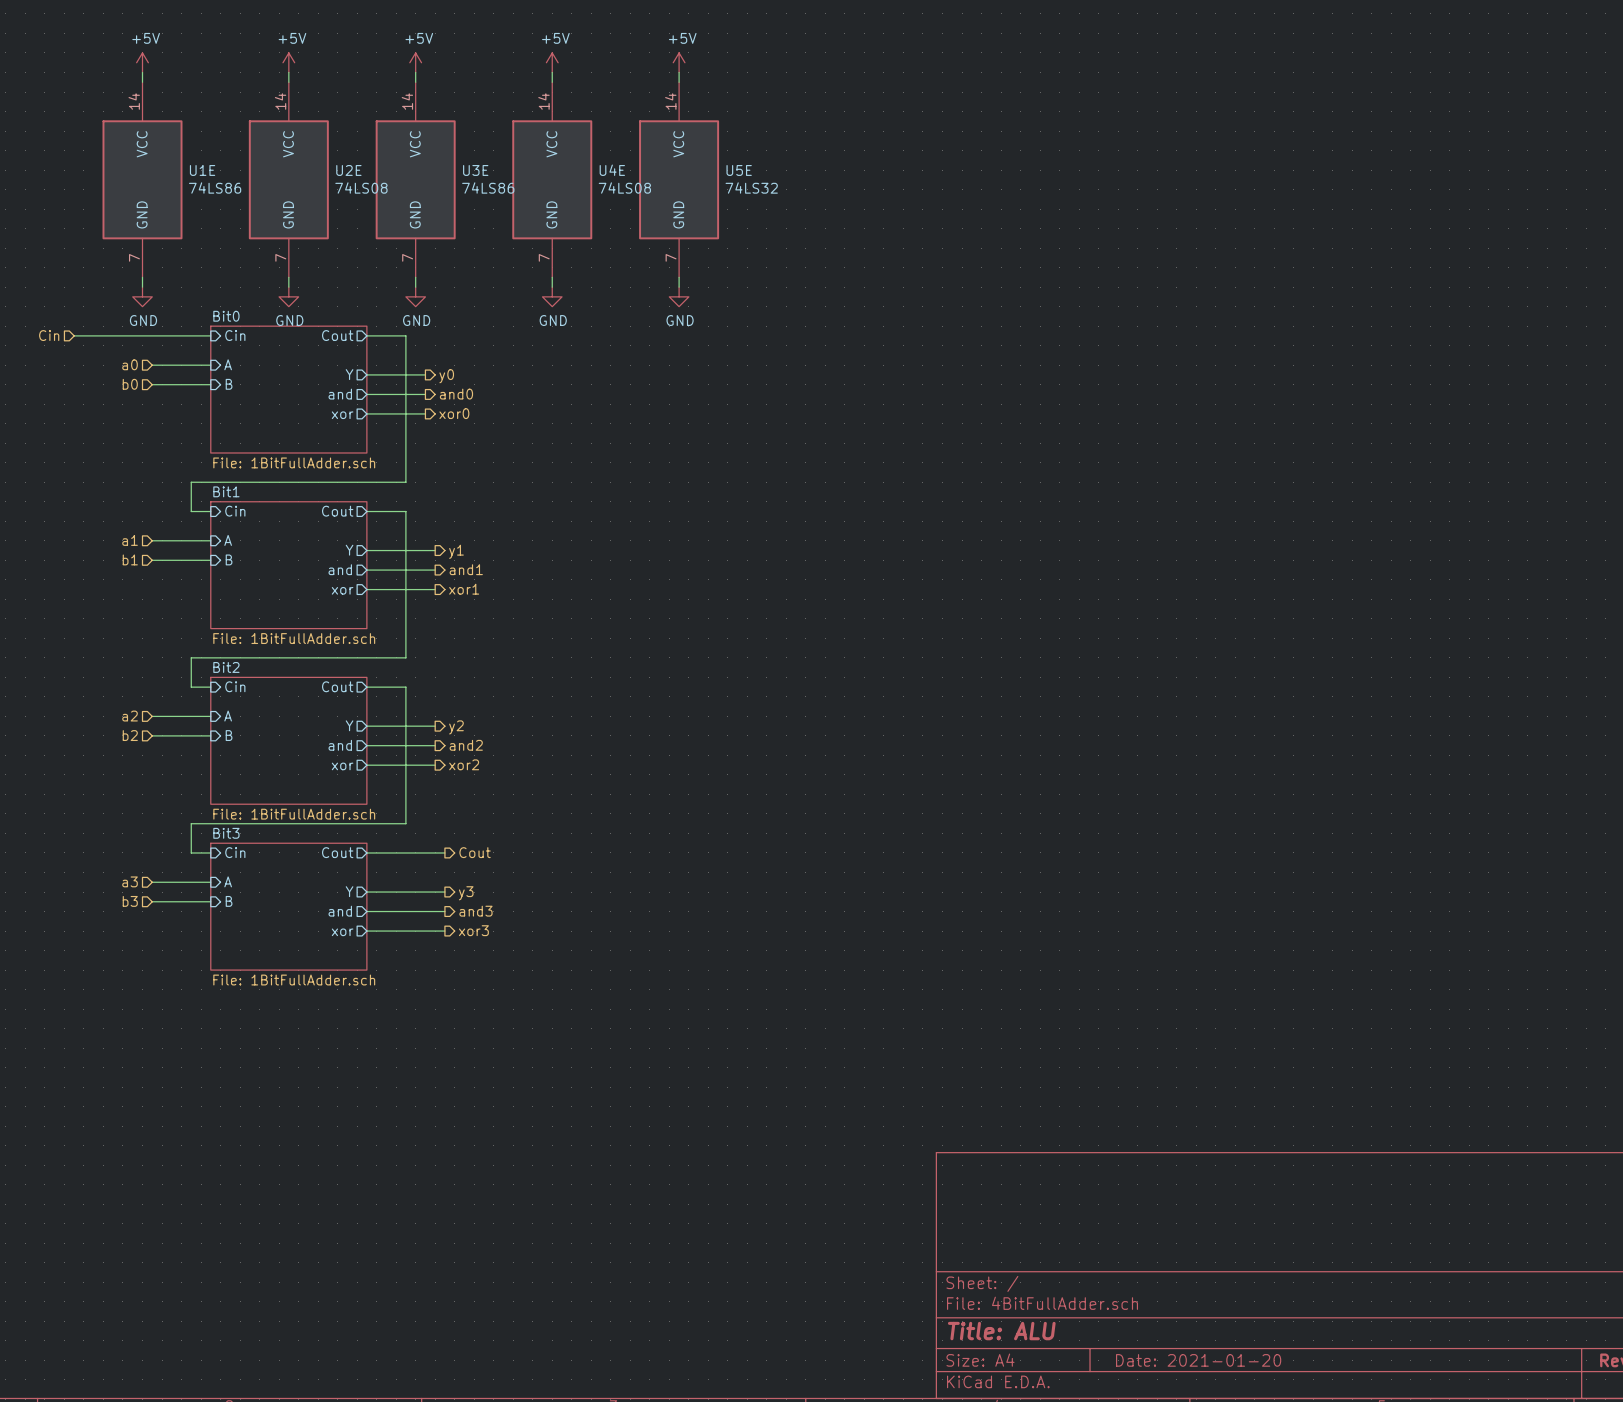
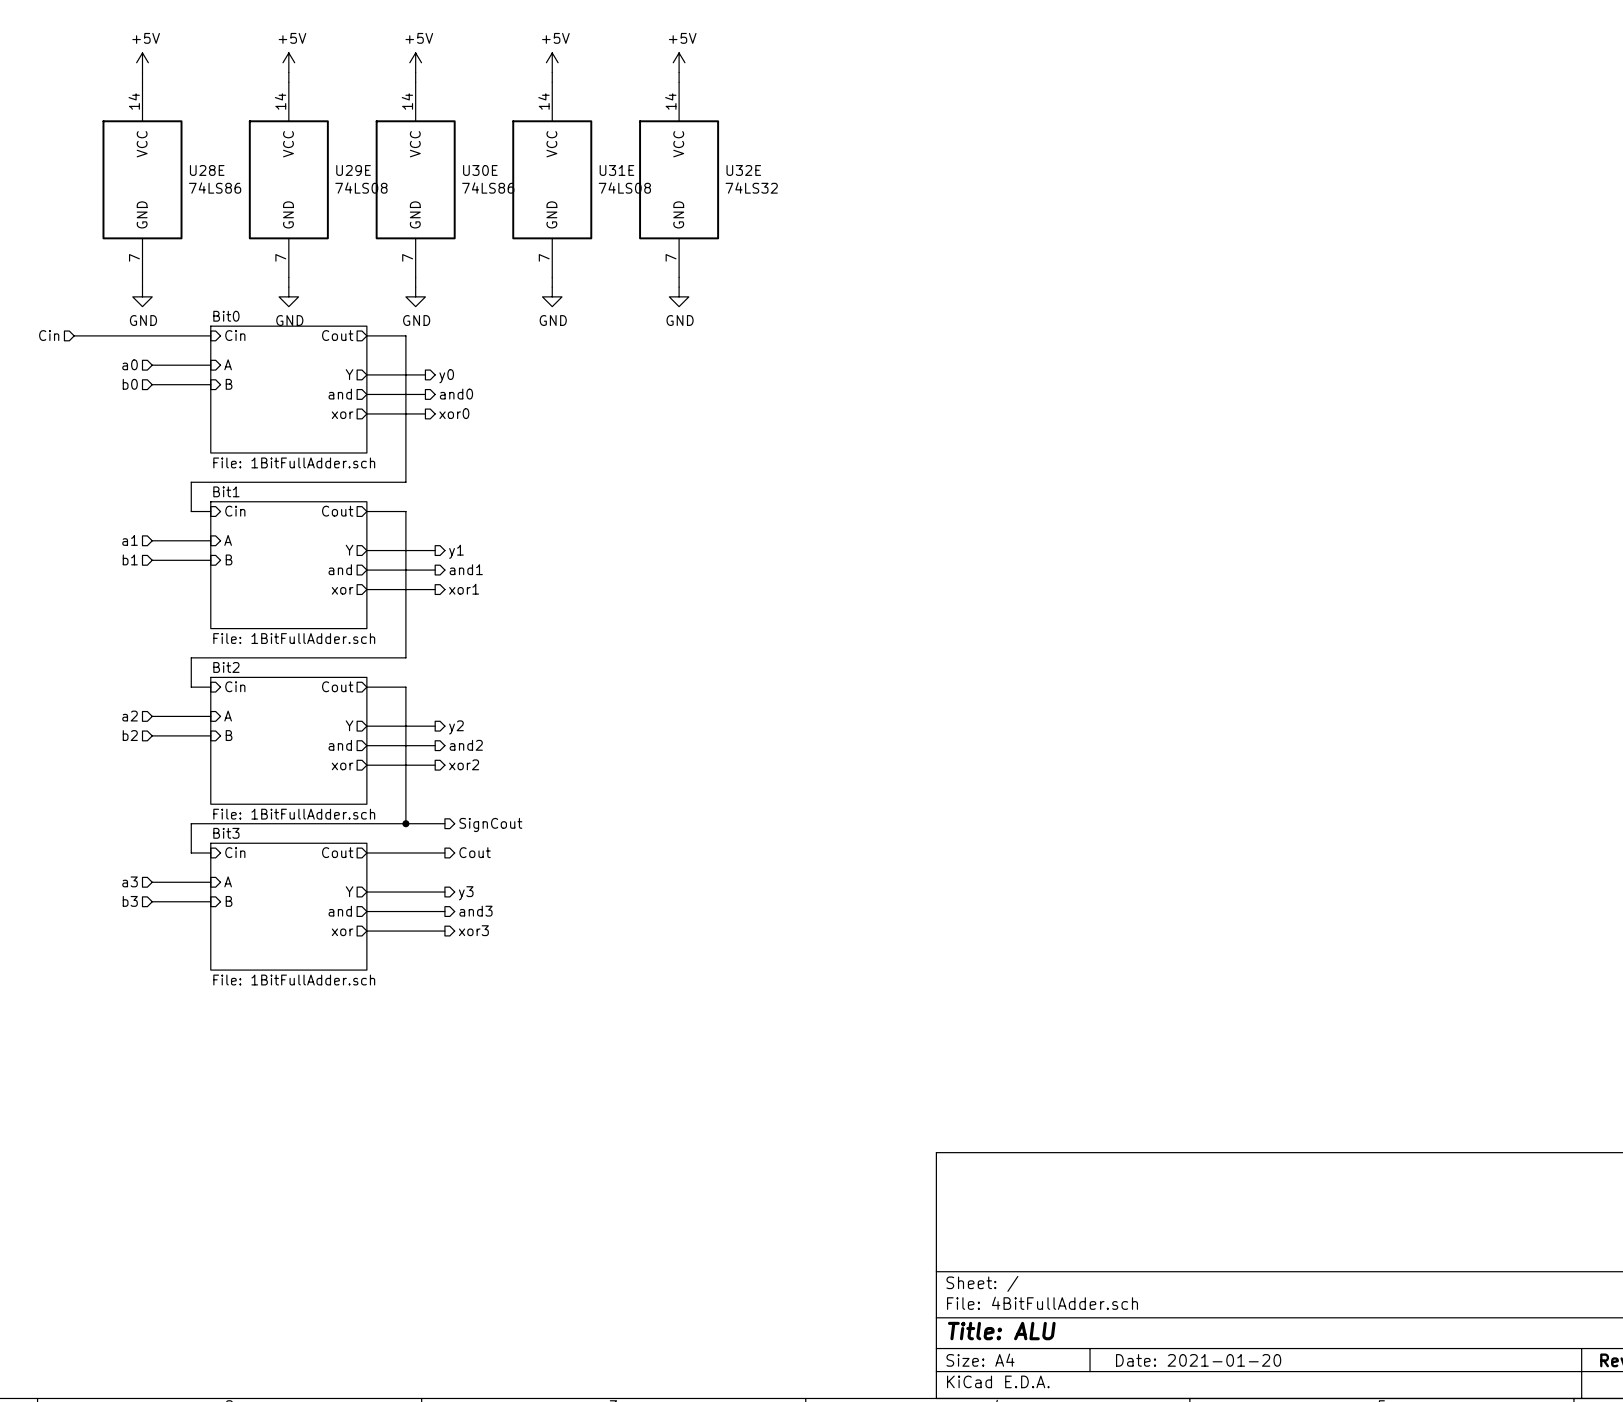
U1E name: U1E (202, 170) -> U28E (207, 170)
U2E name: U2E (348, 170) -> U29E (353, 170)
U3E name: U3E (475, 170) -> U30E (480, 170)
U4E name: U4E (612, 170) -> U31E (616, 170)
U5E name: U5E (739, 170) -> U32E (743, 170)
wire: none -> (405, 823) (444, 823)
junction: none -> (405, 823)
hierarchical label: none -> SignCout (490, 824)

